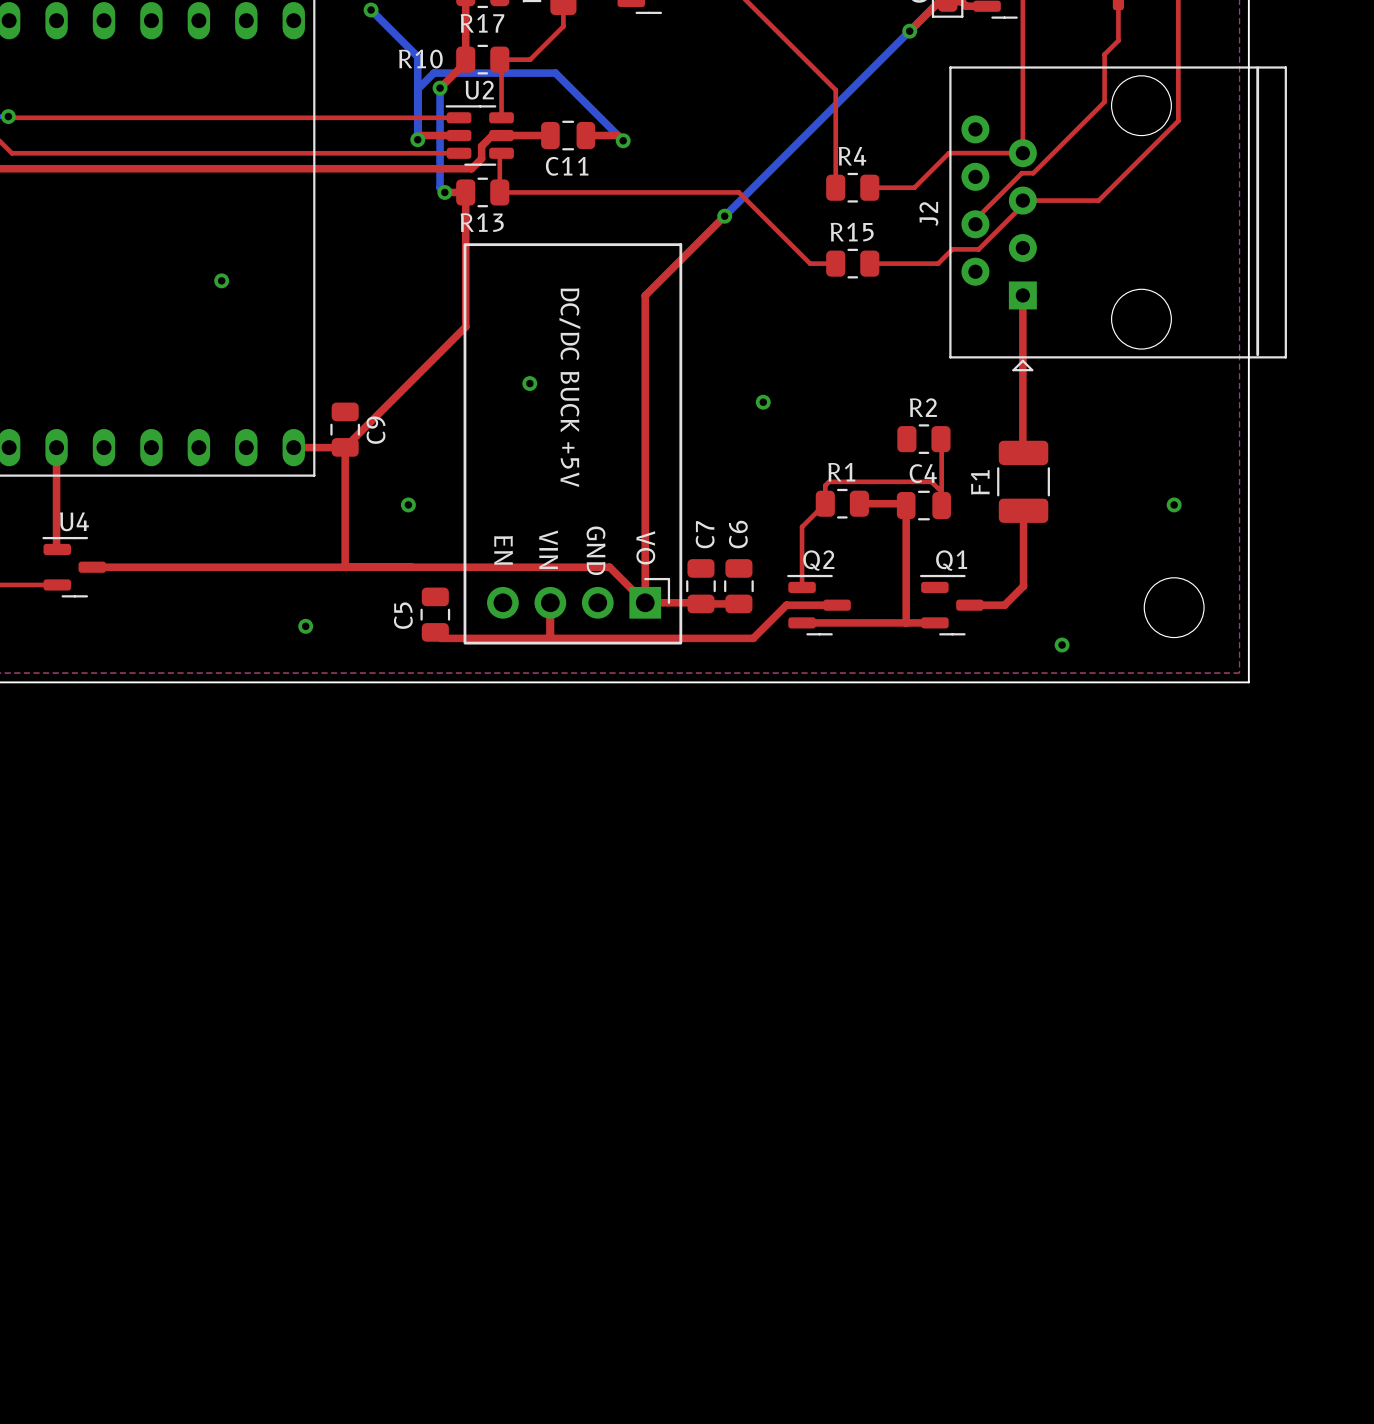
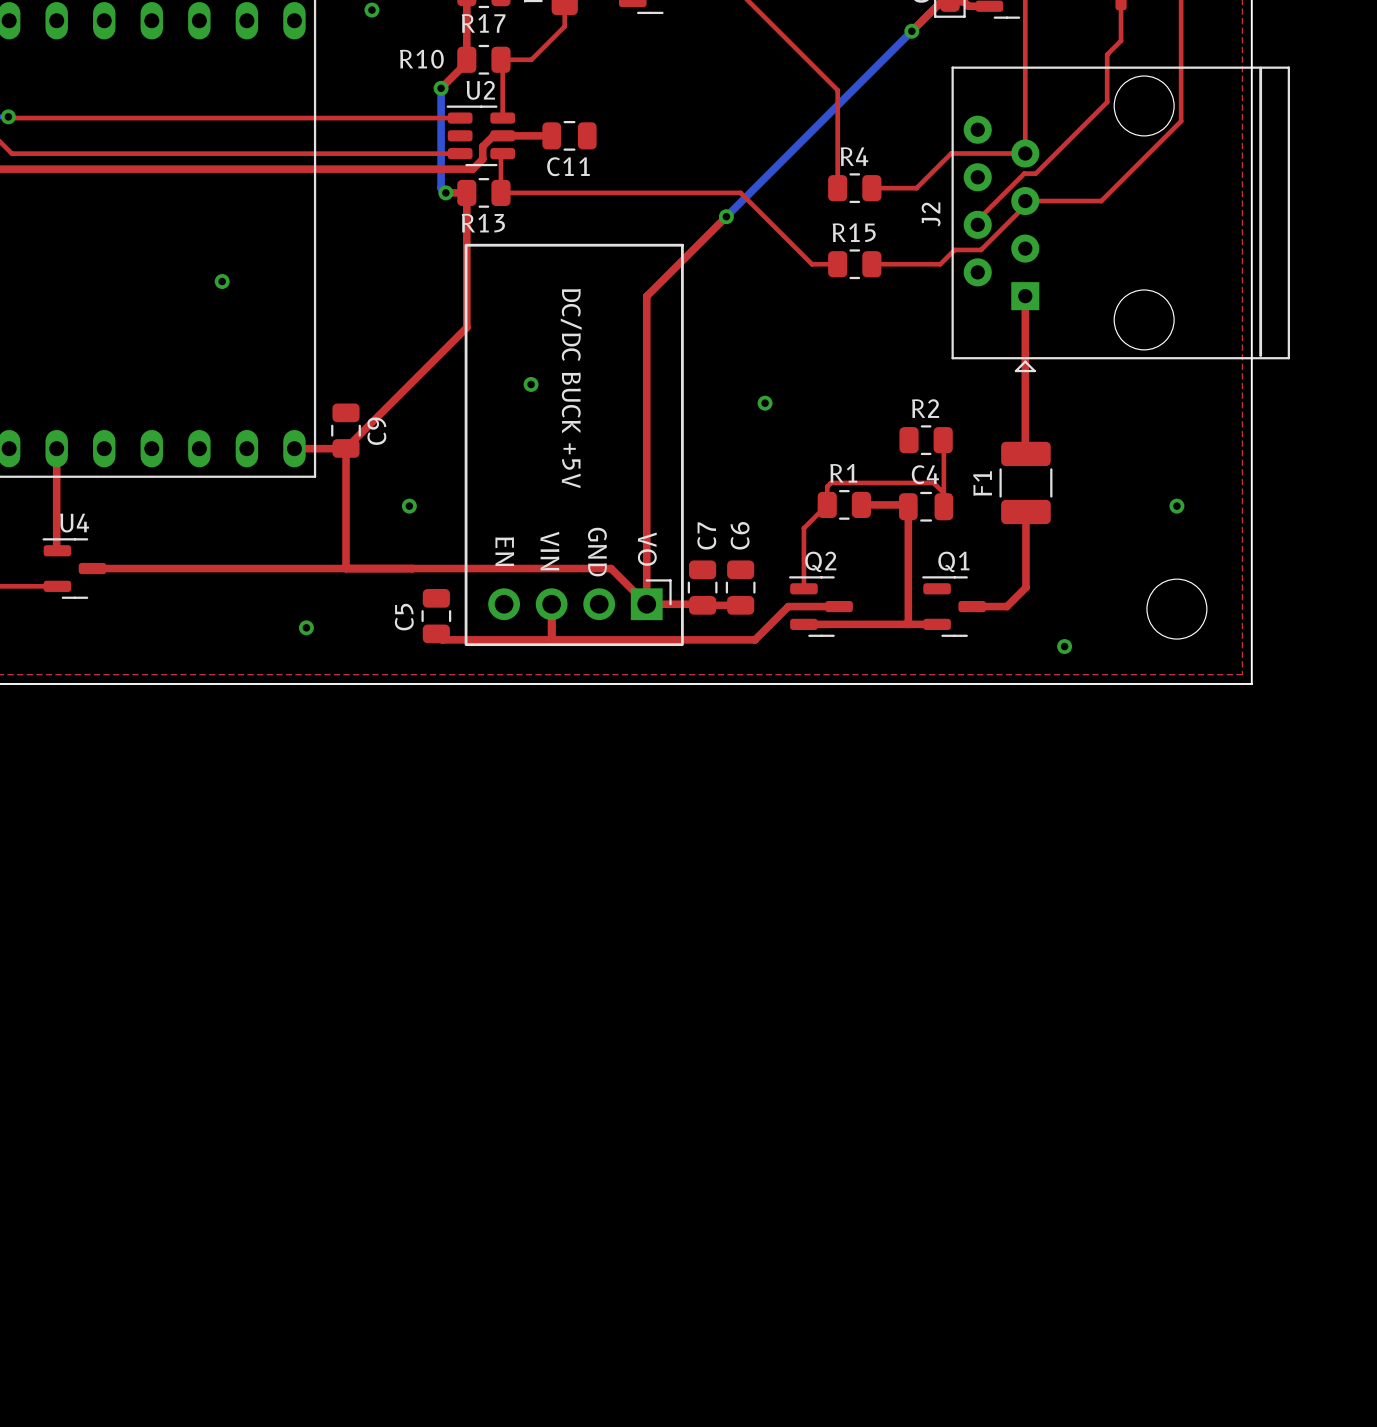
bottom track: (371, 10) (417, 56) (417, 139) -> none
bottom track: (417, 89) (433, 73) (555, 73) (623, 140) -> none
top track: (459, 135) (421, 135) (417, 139) -> none
top track: (585, 135) (617, 135) (623, 140) -> none
via: (417, 139) -> none
via: (623, 140) -> none

